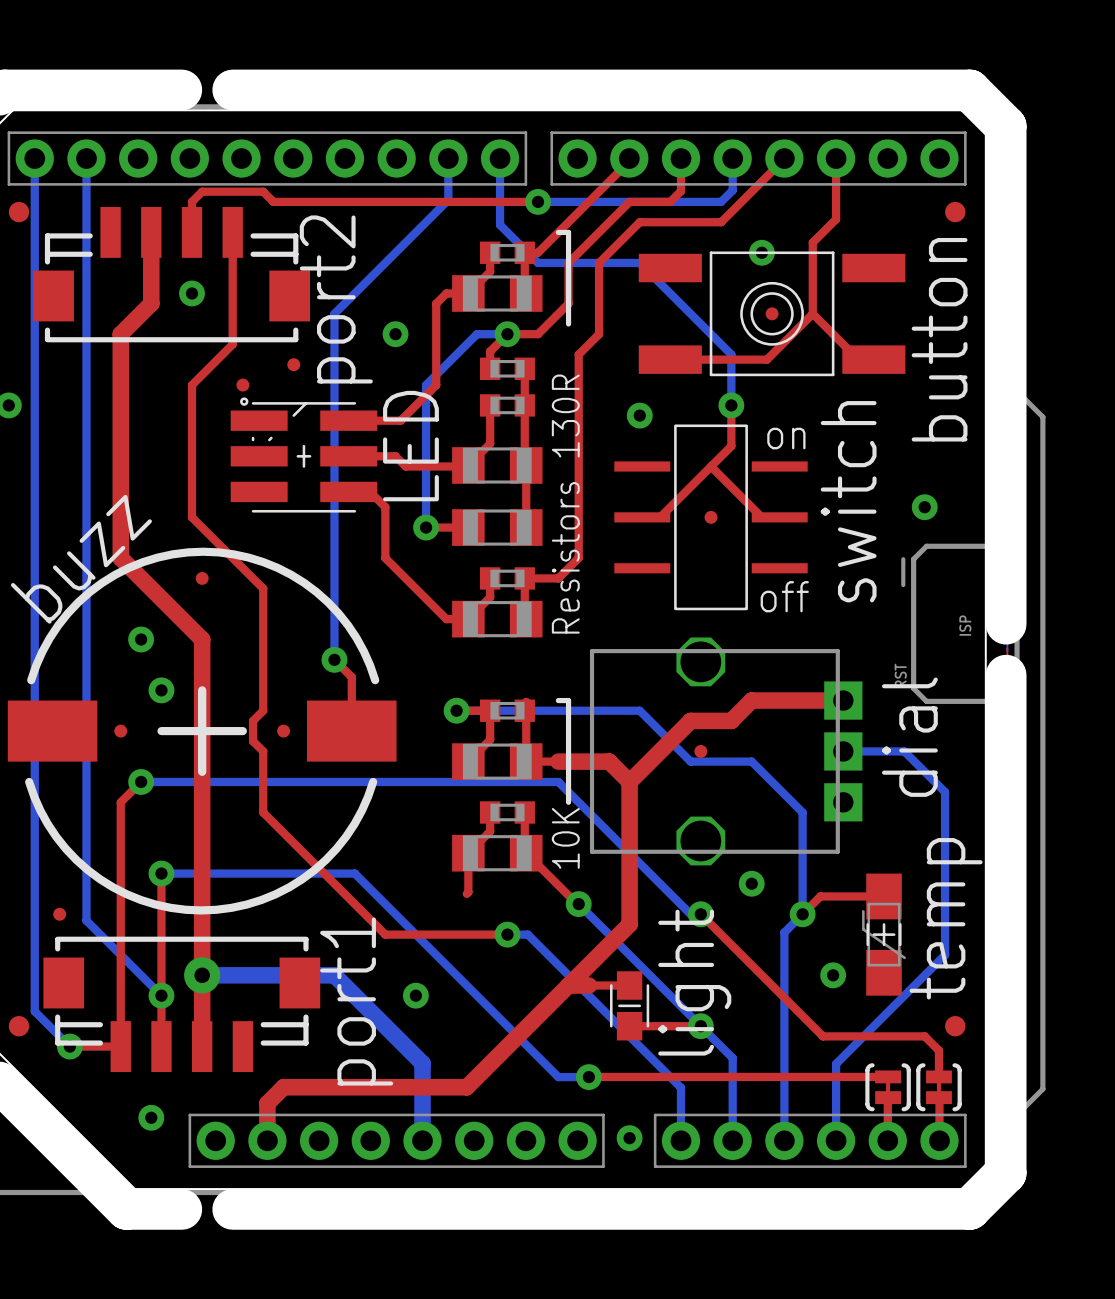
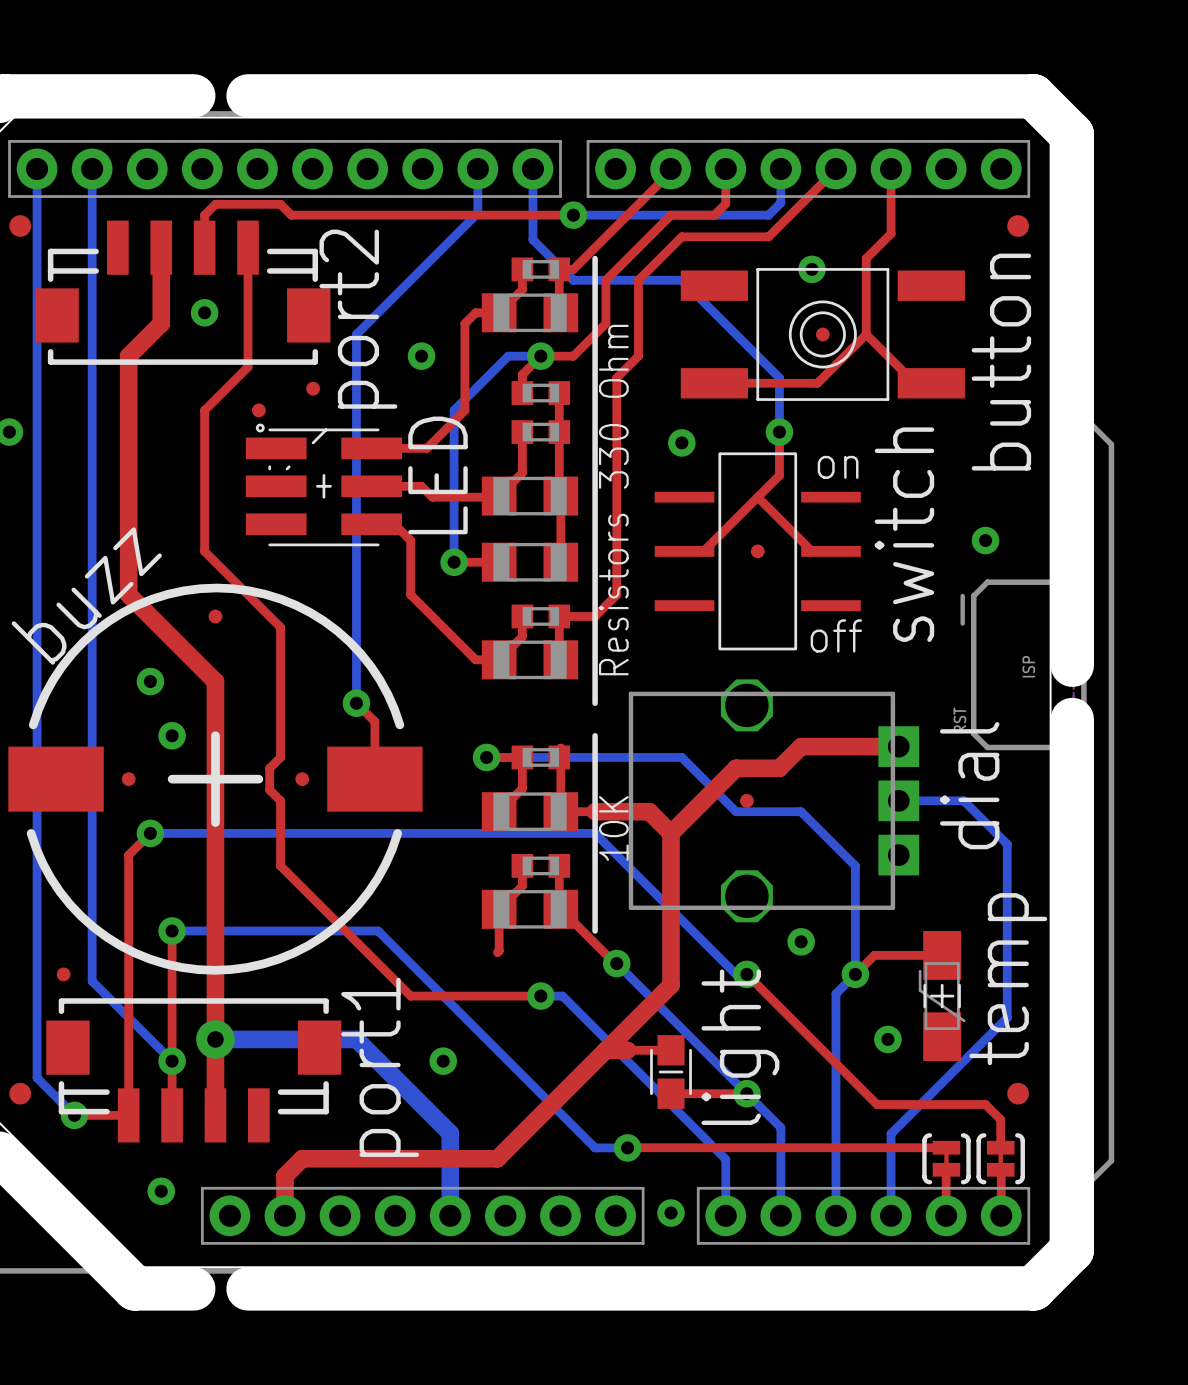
line: (558, 232) (568, 232) (568, 324) -> none
line: none -> (595, 258) (595, 703)
text: Resistors 130R (565, 504) -> Resistors 330 Ohm (613, 500)
line: none -> (595, 735) (595, 931)
line: (558, 700) (568, 700) (568, 802) -> none
text position: 10K (565, 838) -> 10K (613, 828)

